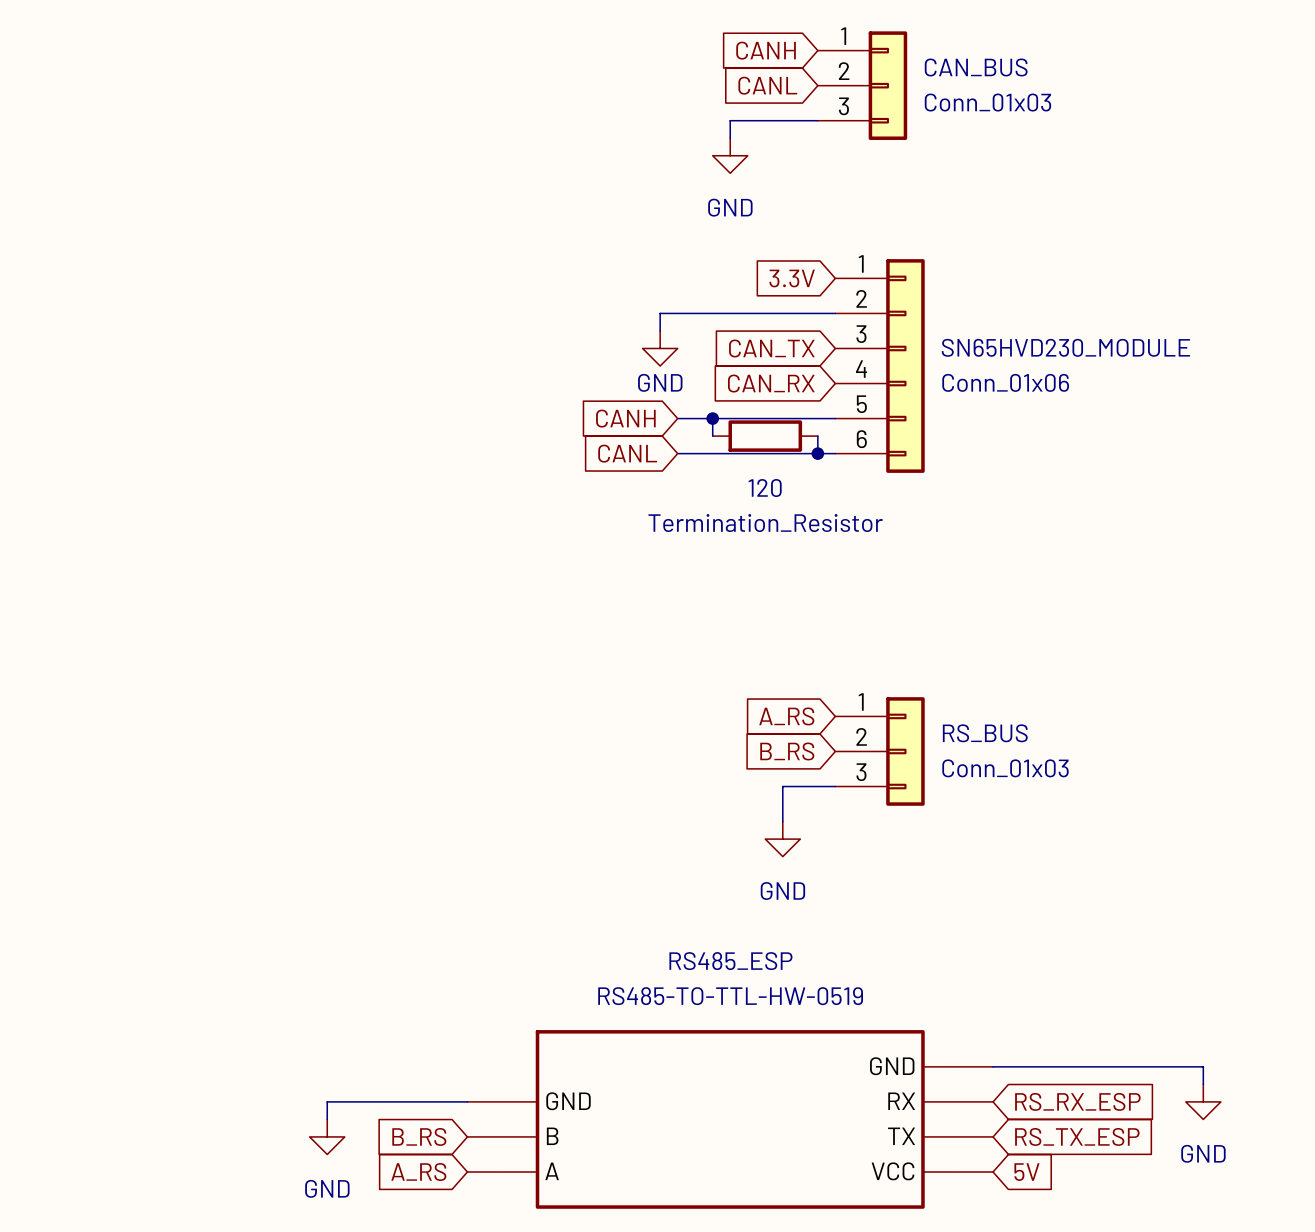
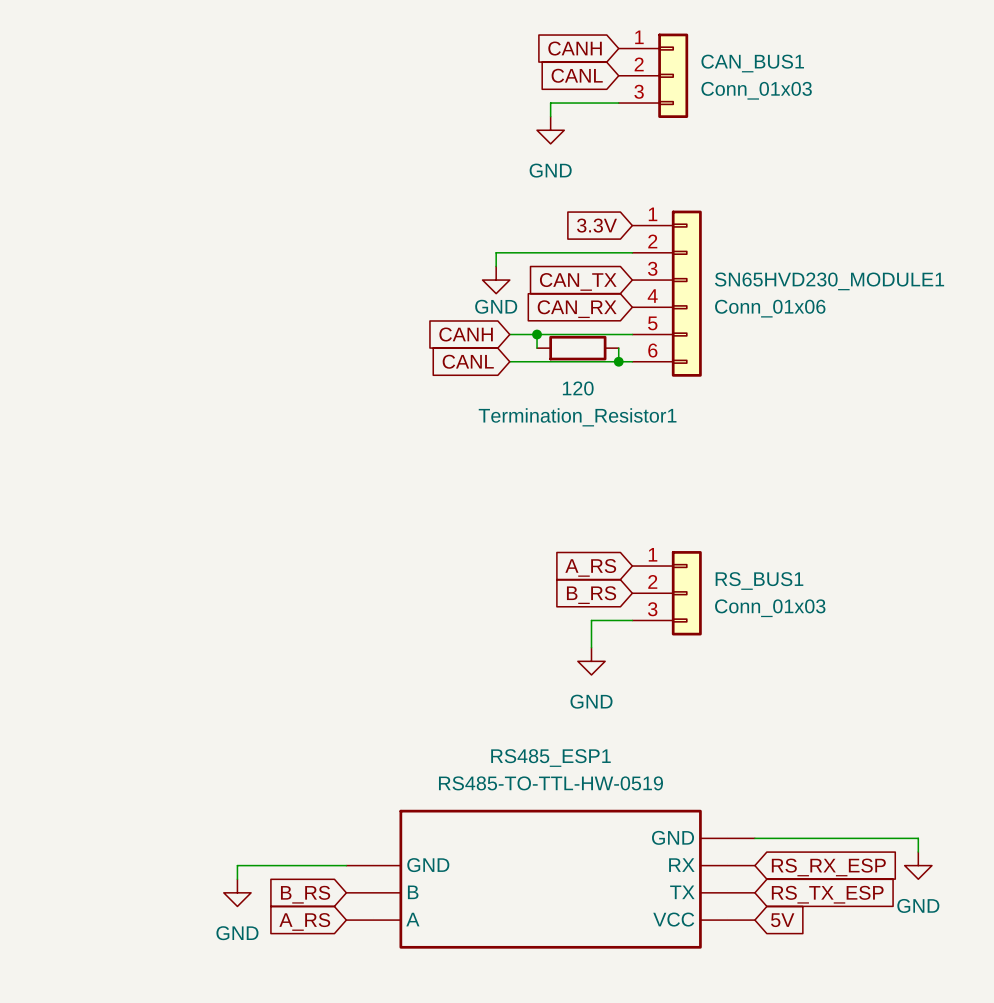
CAN_BUS name: CAN_BUS (976, 67) -> CAN_BUS1 (752, 63)
SN65HVD230_MODULE name: SN65HVD230_MODULE (1065, 347) -> SN65HVD230_MODULE1 (829, 281)
Termination_Resistor name: Termination_Resistor (765, 523) -> Termination_Resistor1 (577, 417)
RS_BUS name: RS_BUS (985, 733) -> RS_BUS1 (759, 580)
RS485_ESP name: RS485_ESP (730, 961) -> RS485_ESP1 (550, 758)

